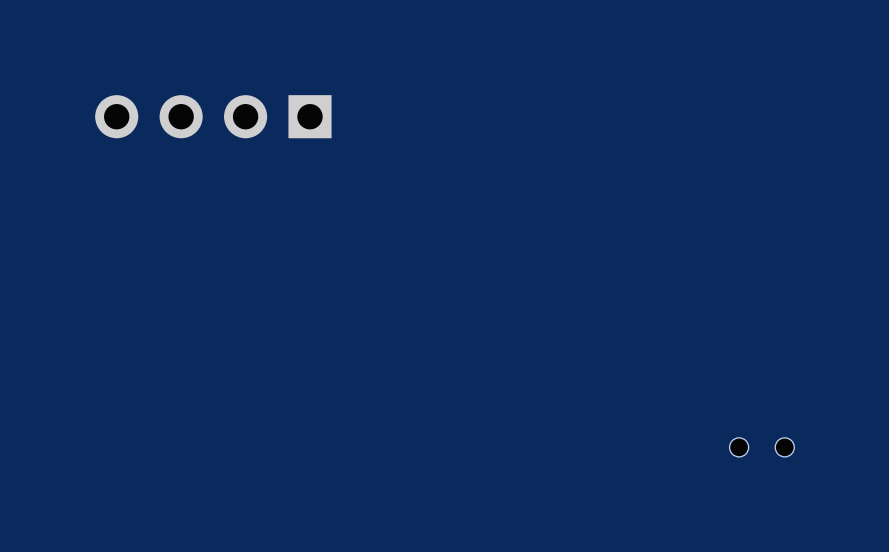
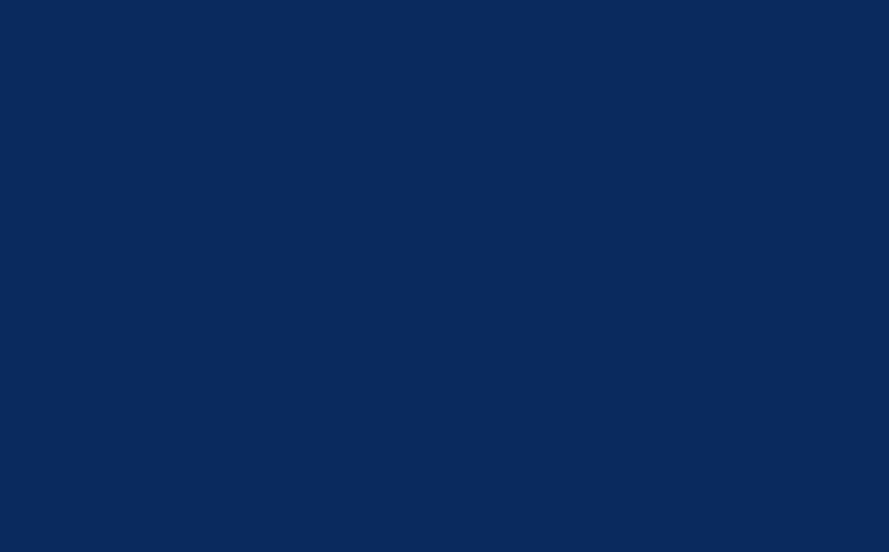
part: (213, 116) -> none
part: (761, 447) -> none

